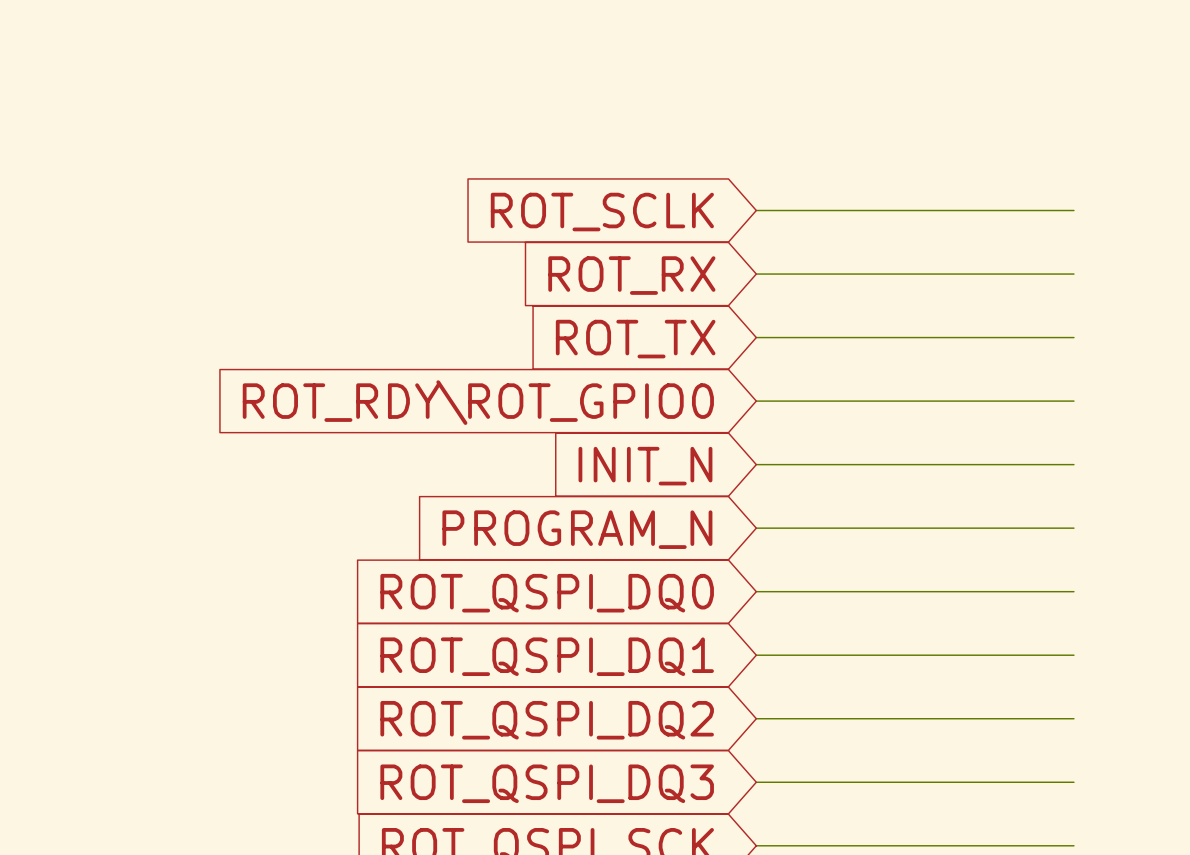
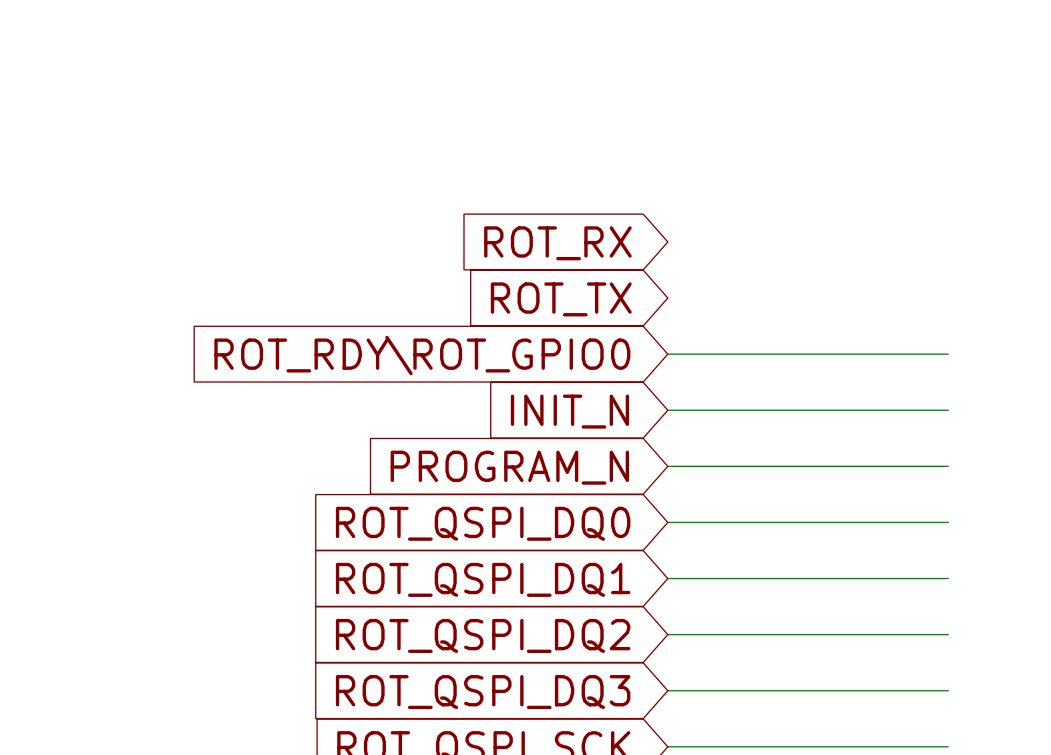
wire: (756, 210) (1073, 210) -> none
global label: ROT_SCLK (602, 212) -> none
wire: (756, 274) (1073, 274) -> none
wire: (756, 337) (1073, 337) -> none

